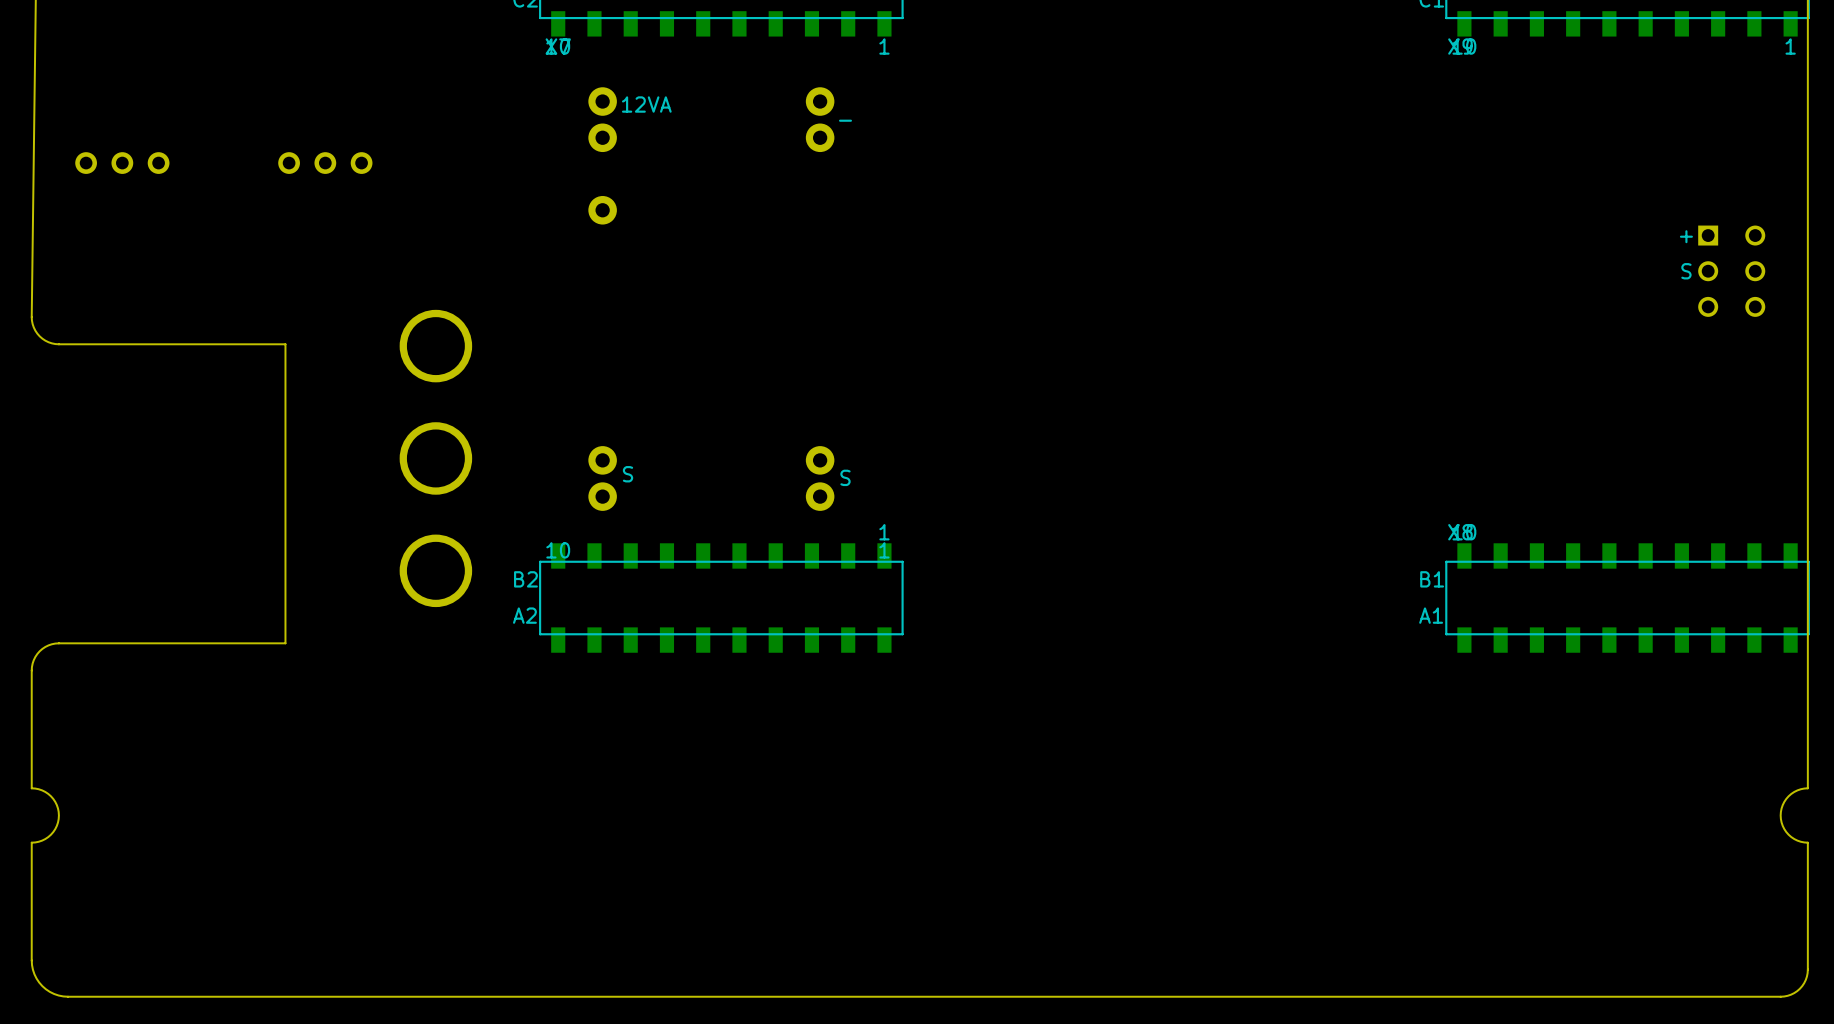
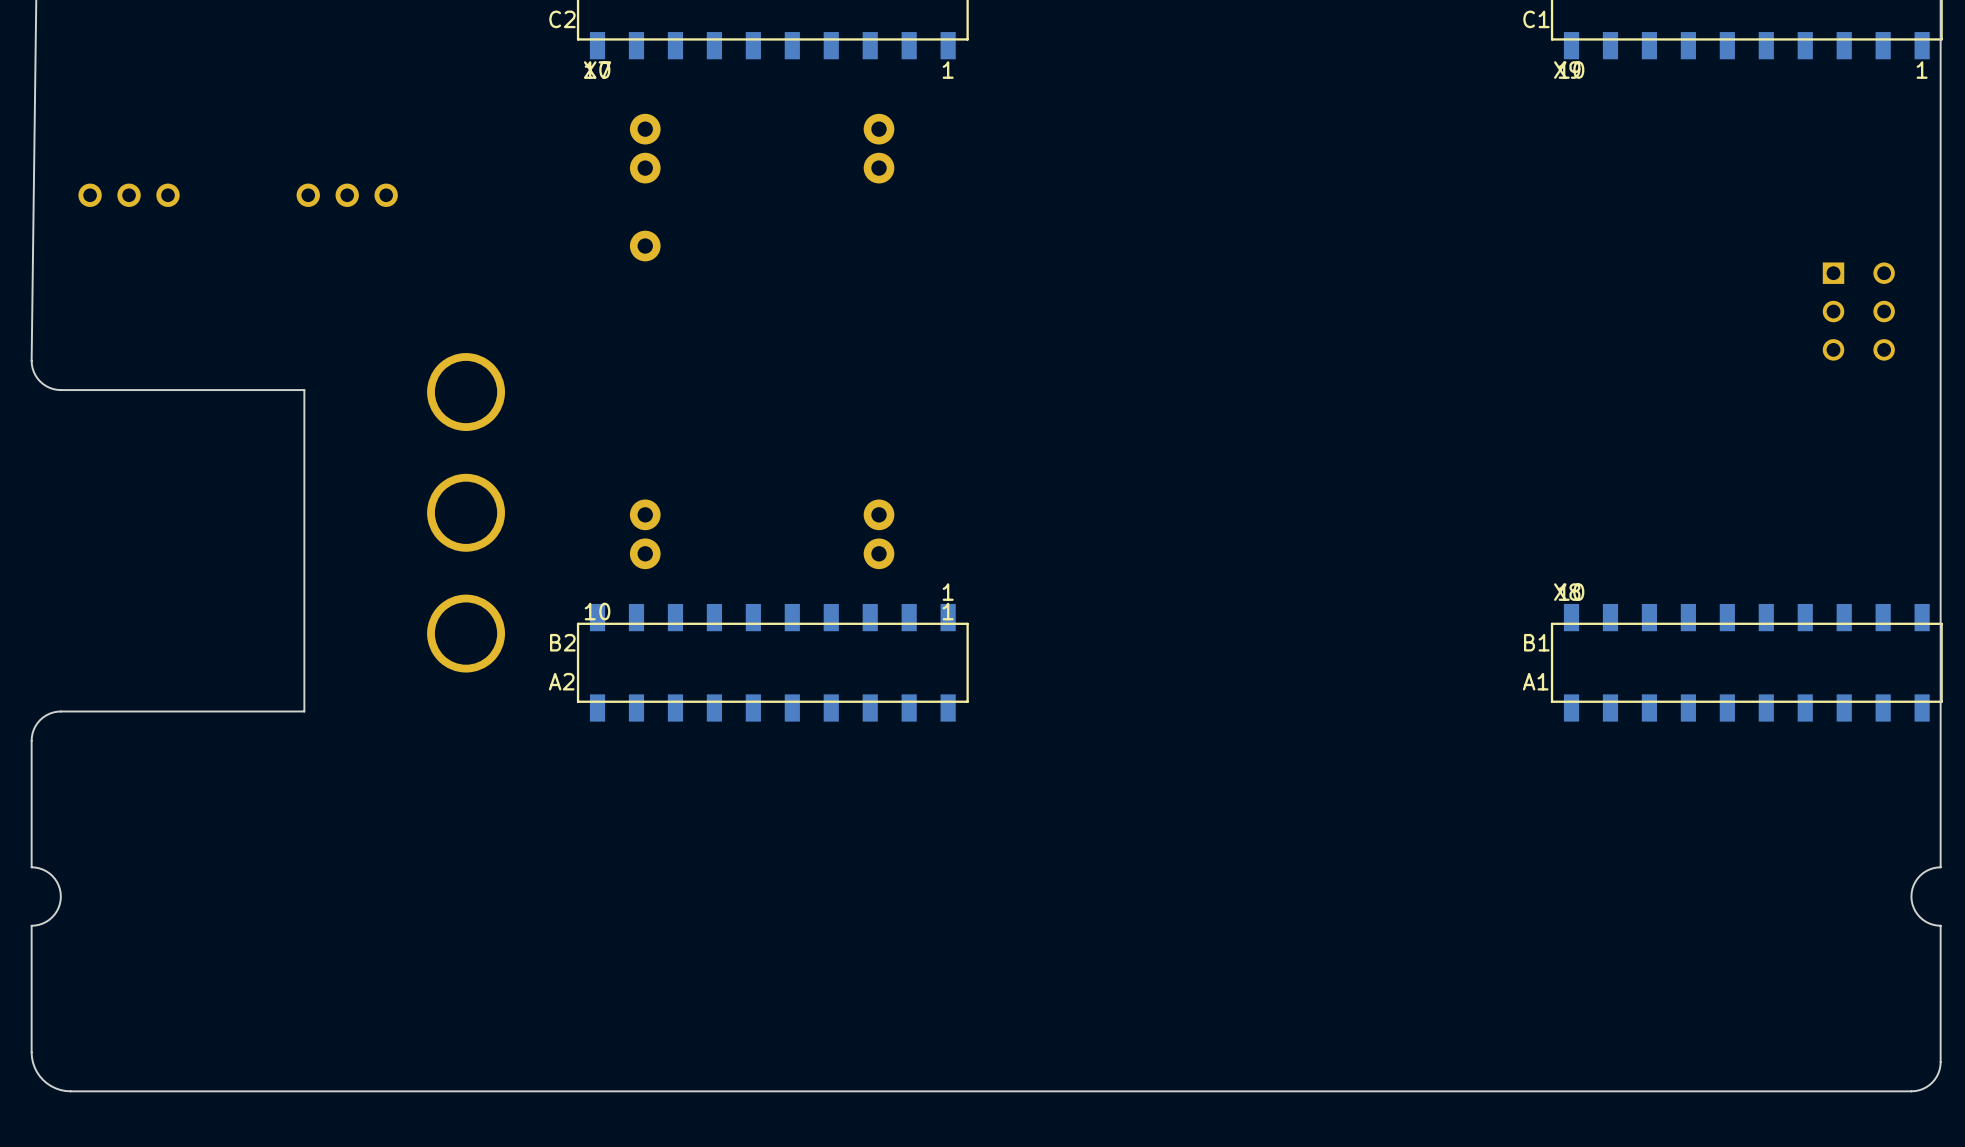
text: 12VA (646, 104) -> none
text: - (845, 120) -> none
text: + (1686, 236) -> none
text: S (1686, 271) -> none
text: S (628, 474) -> none
text: S (845, 477) -> none

